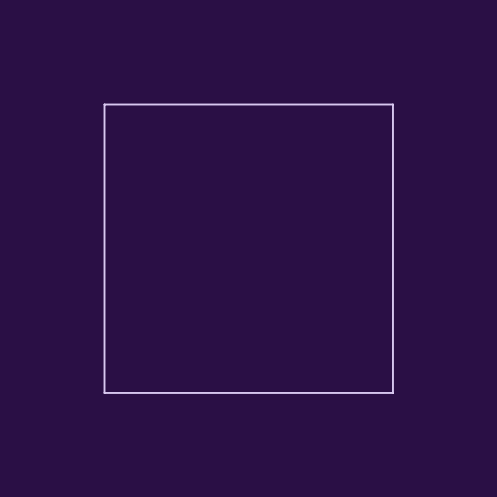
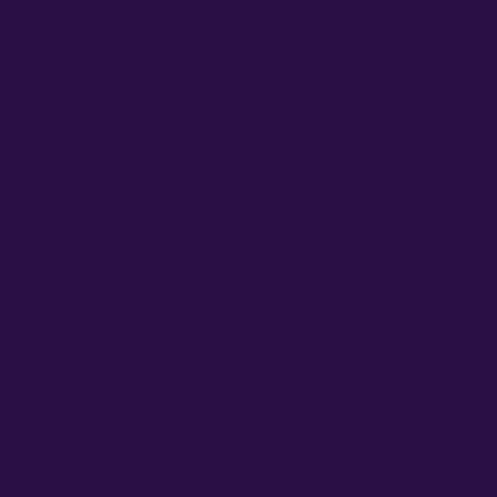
board edge: (392, 104) (104, 104) (104, 392) (392, 392) (392, 104) -> none

